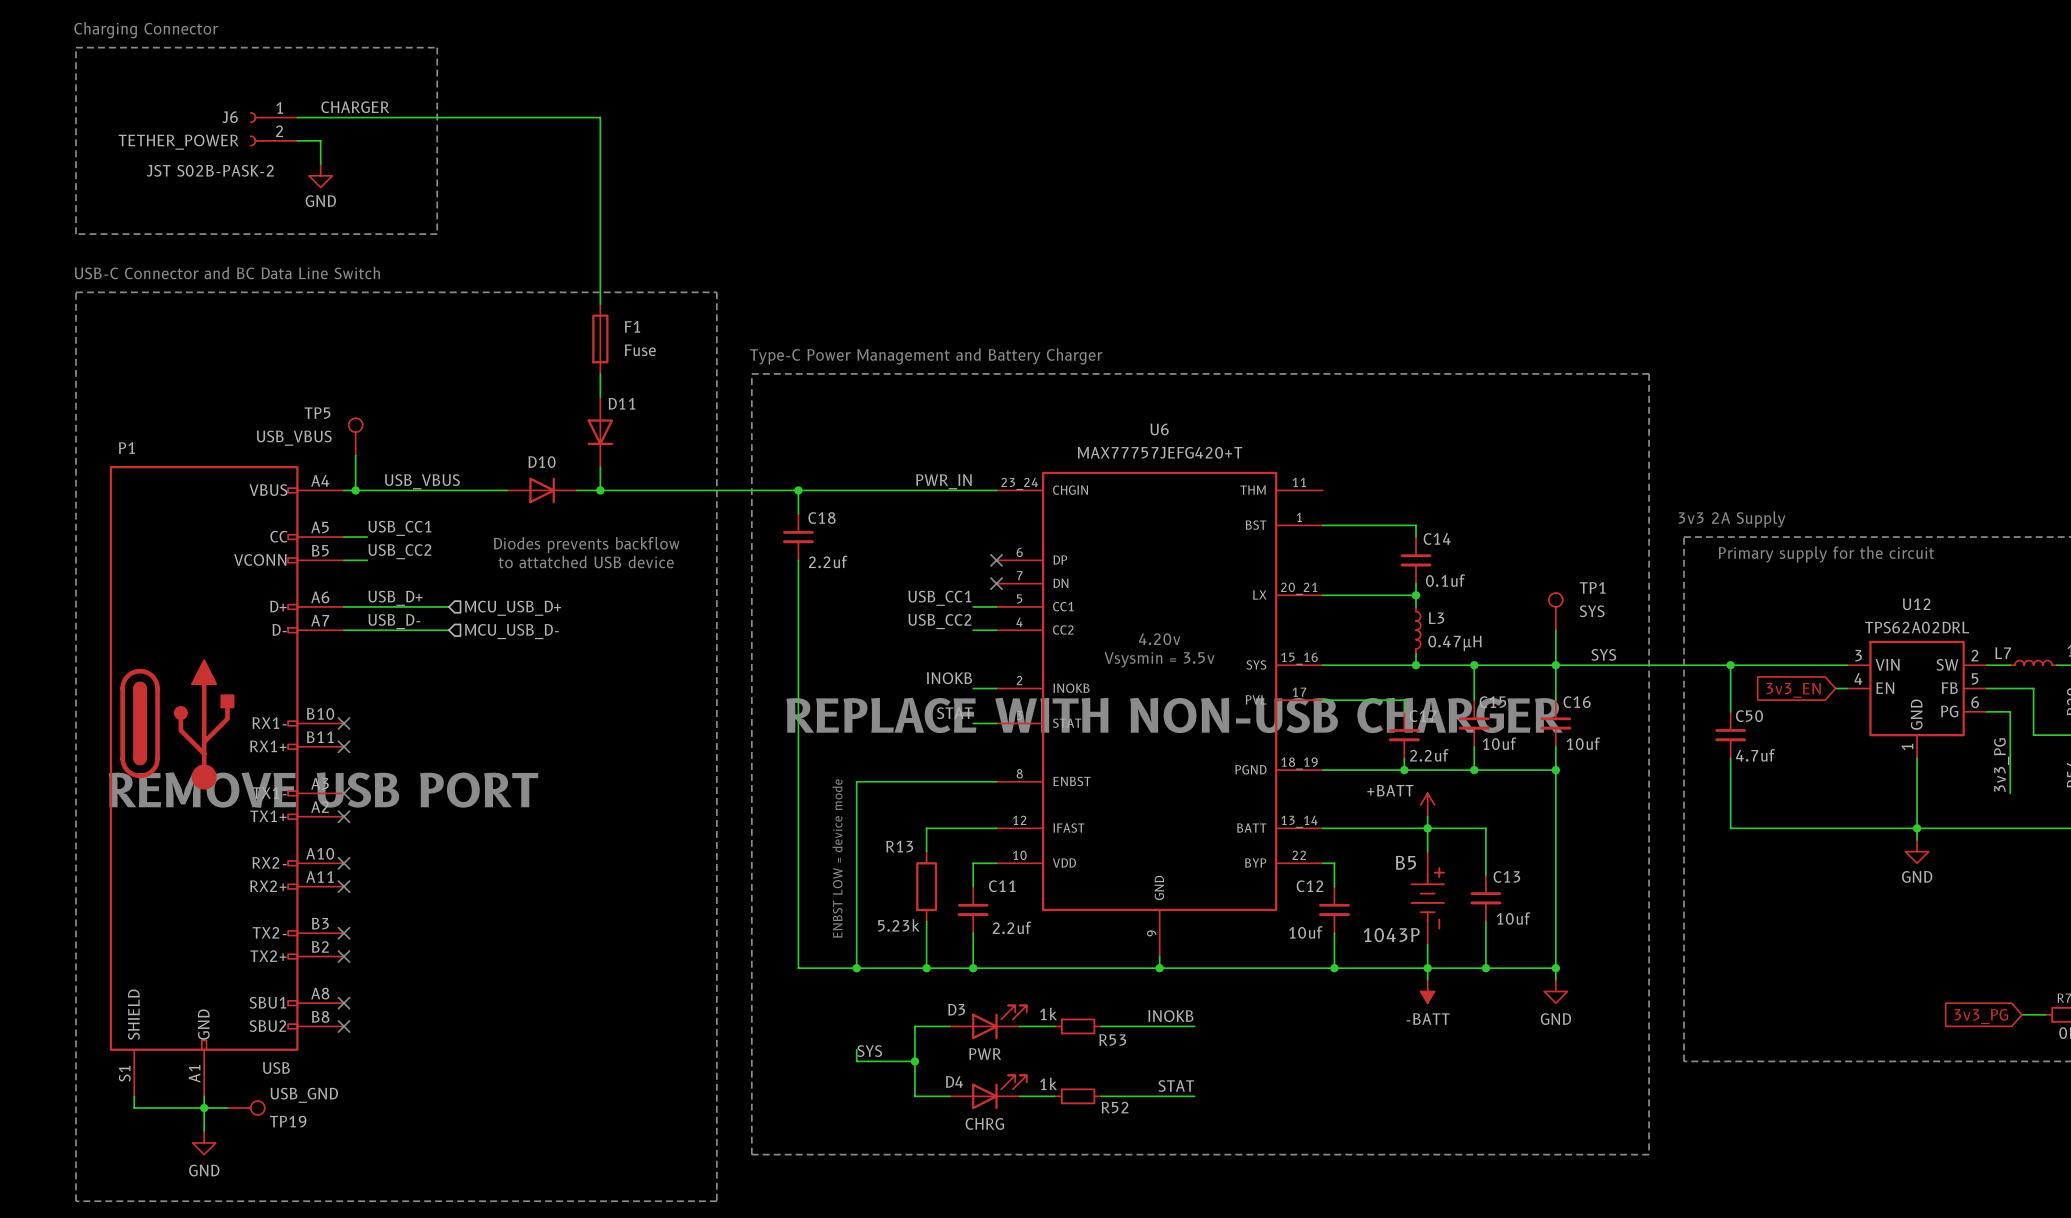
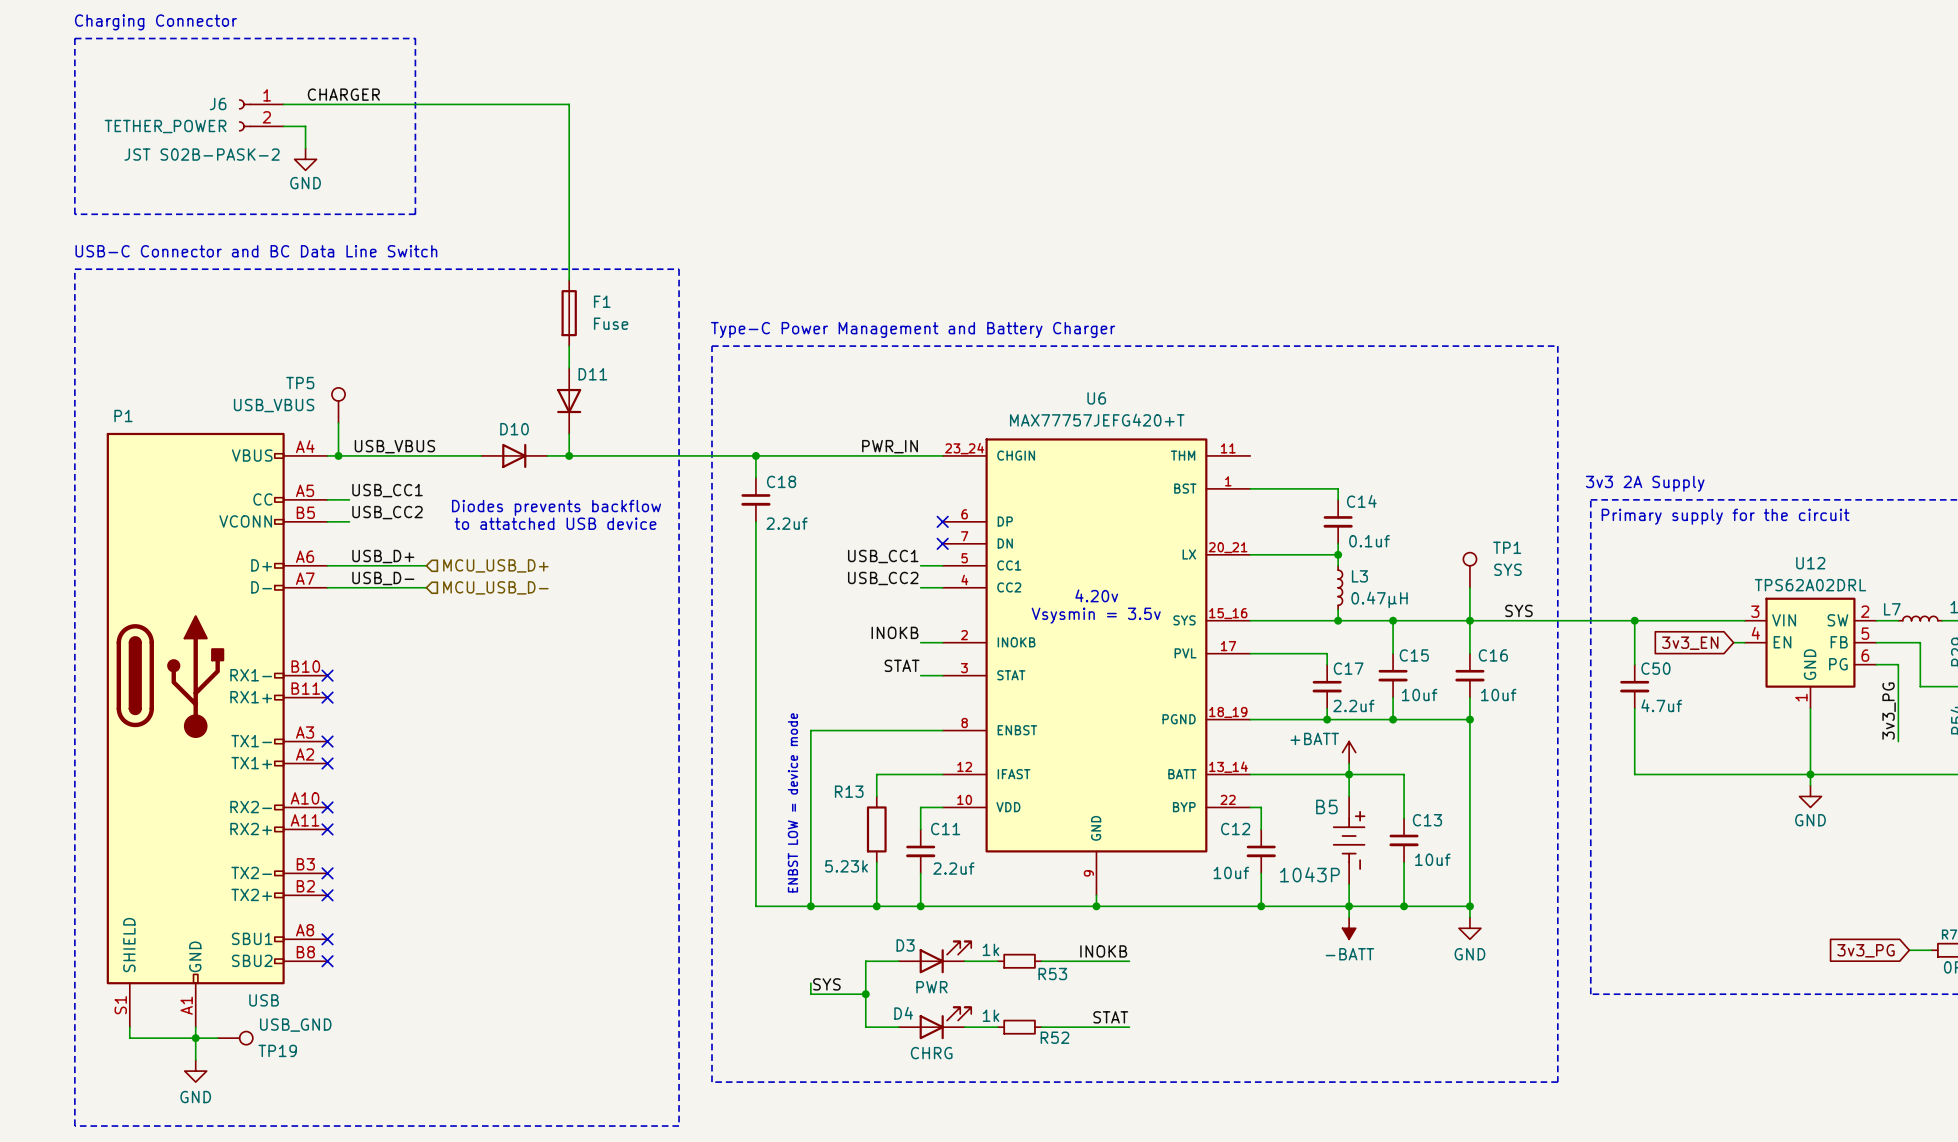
text: REPLACE WITH NON-USB CHARGER (1174, 715) -> none
text: REMOVE USB PORT (323, 790) -> none

